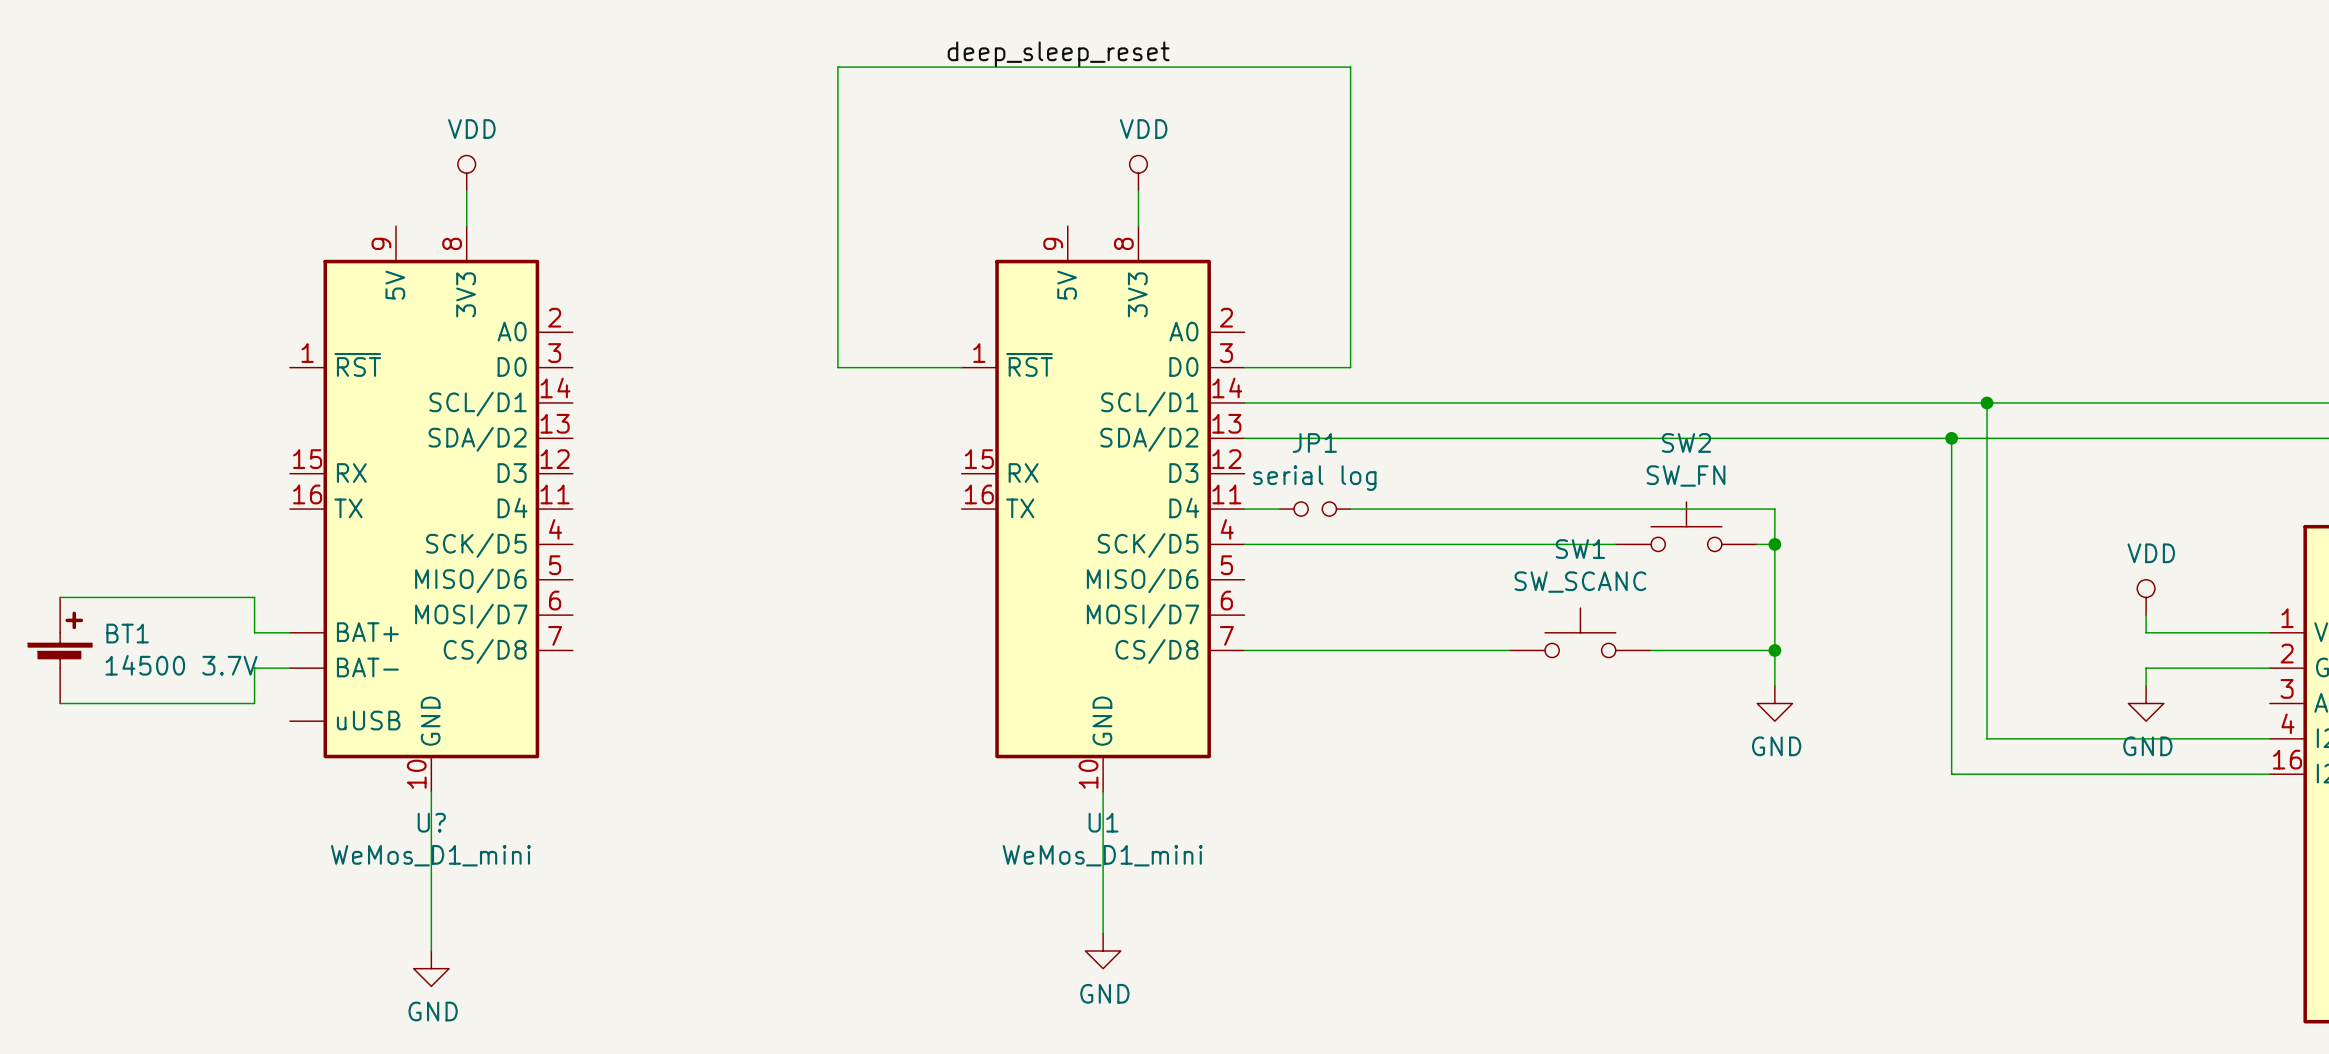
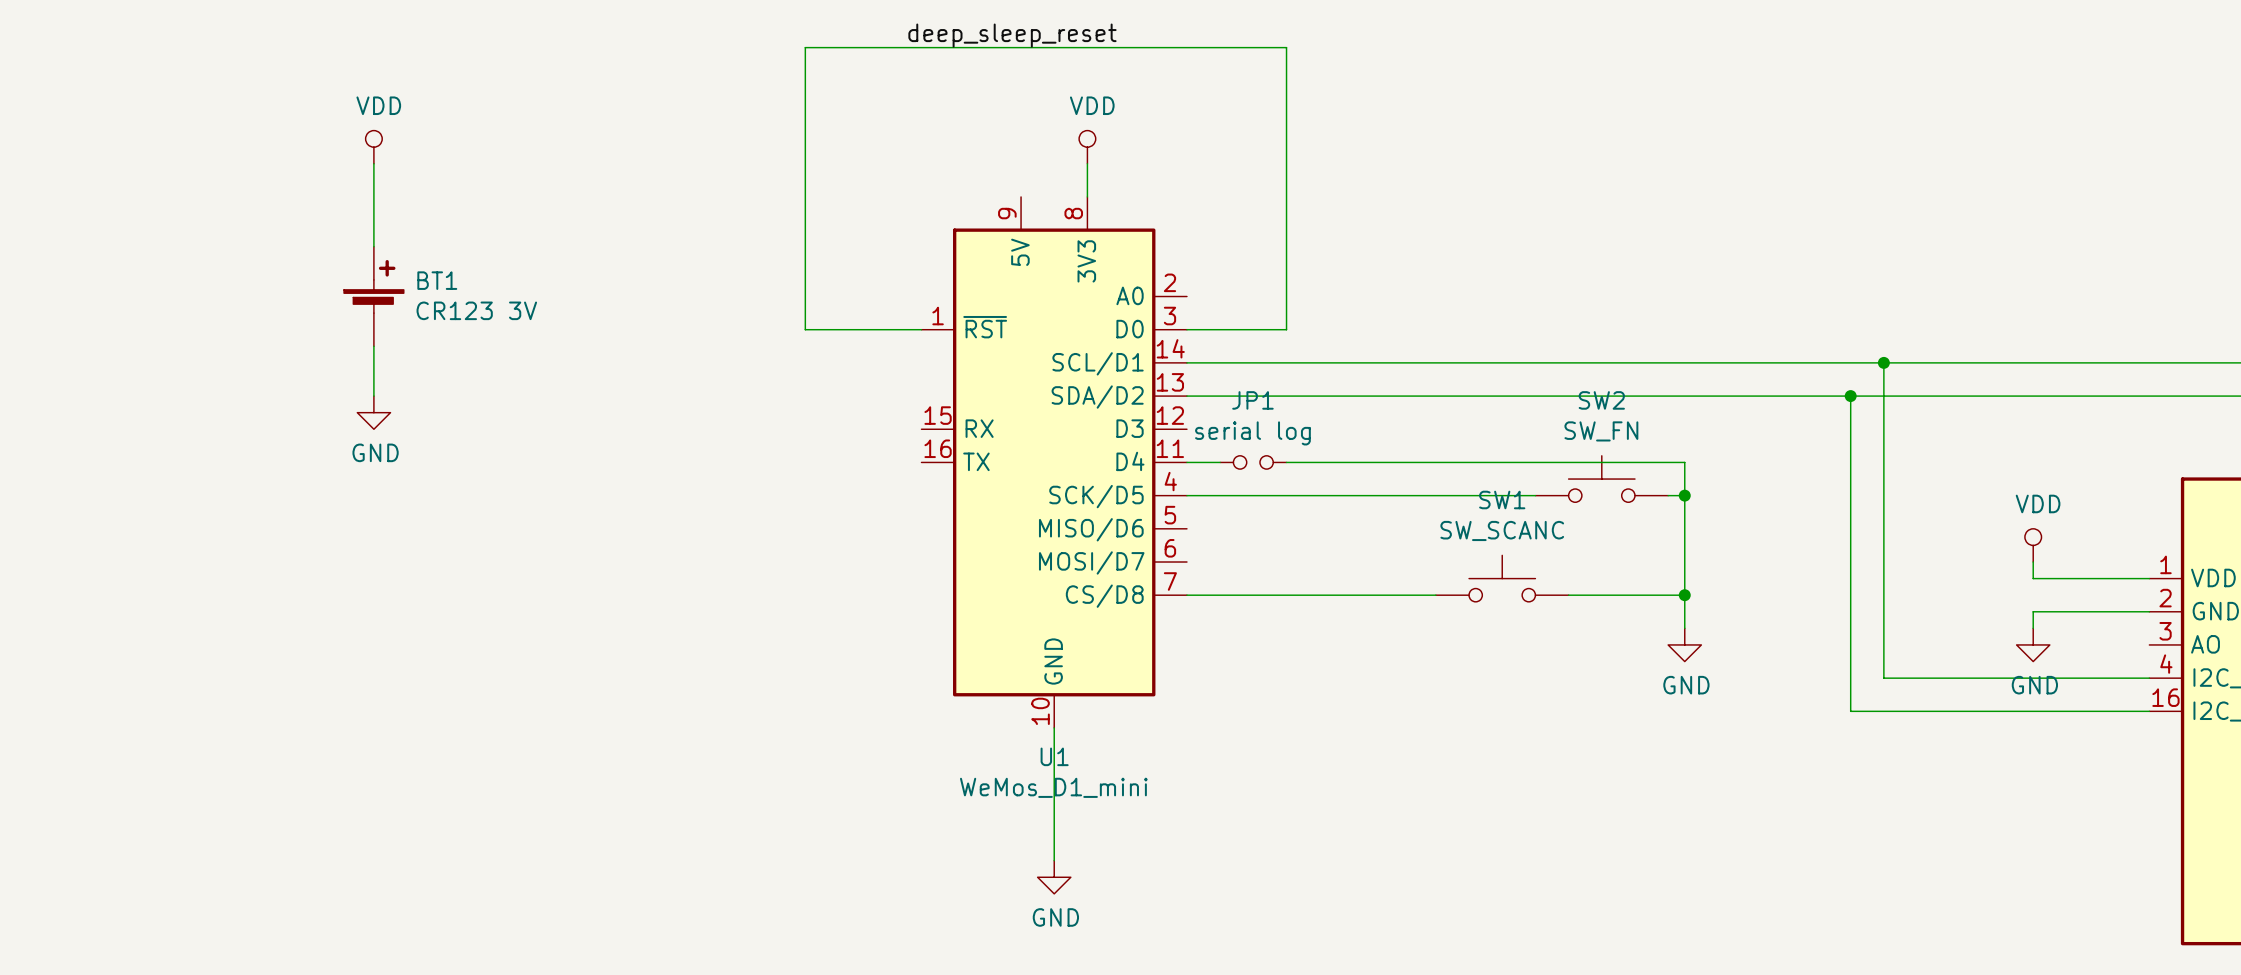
power symbol position: VDD (466, 173) -> VDD (373, 147)
wire: none -> (373, 163) (373, 246)
wire: (466, 190) (466, 226) -> none
power symbol: none -> GND (373, 412)
U?: WeMos_D1_mini (431, 509) -> none
wire: (60, 597) (254, 597) (254, 632) (289, 632) -> none
BT1 position: (60, 650) -> (373, 296)
BT1 value: 14500 3.7V (181, 665) -> CR123 3V (476, 310)
wire: (289, 668) (254, 668) (254, 703) (60, 703) -> none
wire: (431, 791) (431, 950) -> none
power symbol: GND (431, 968) -> none

